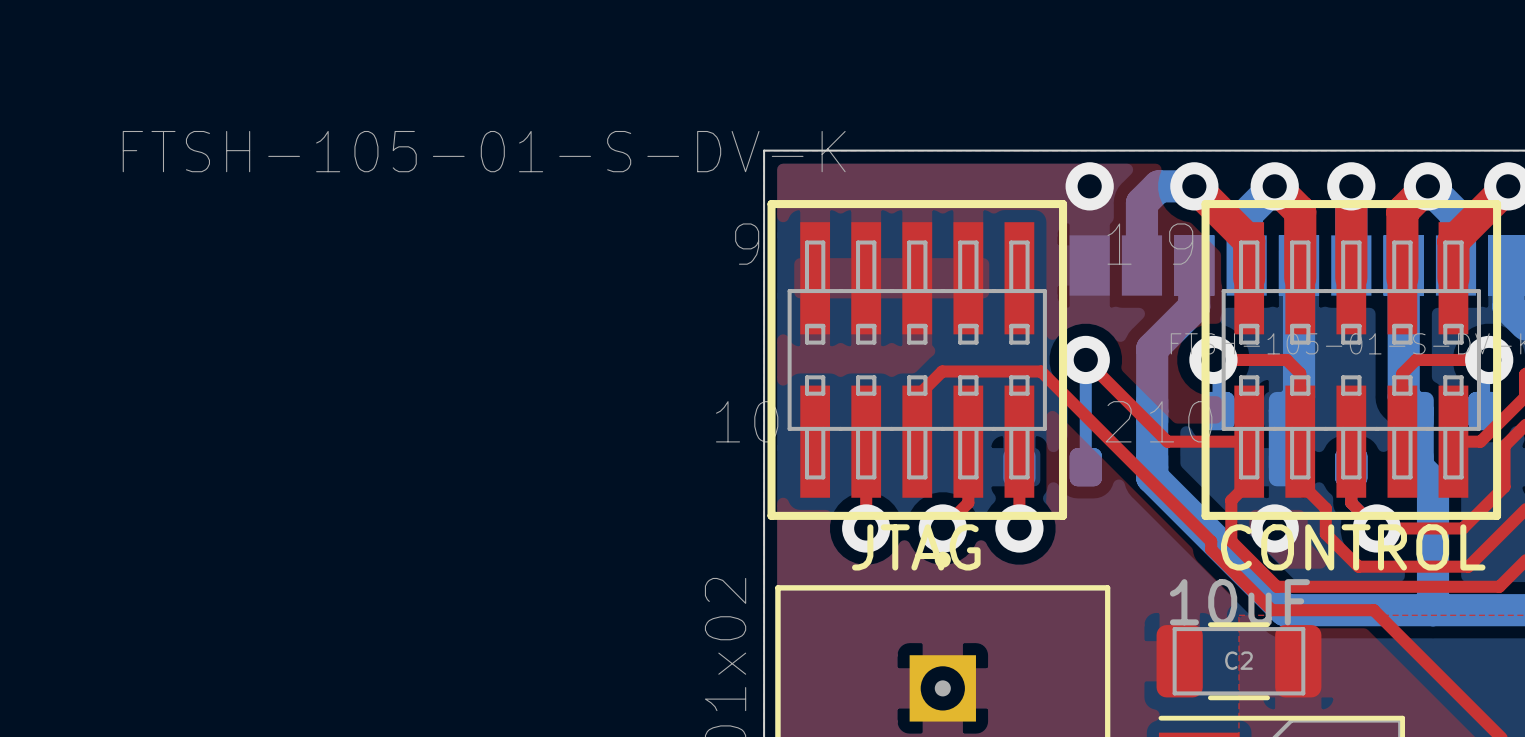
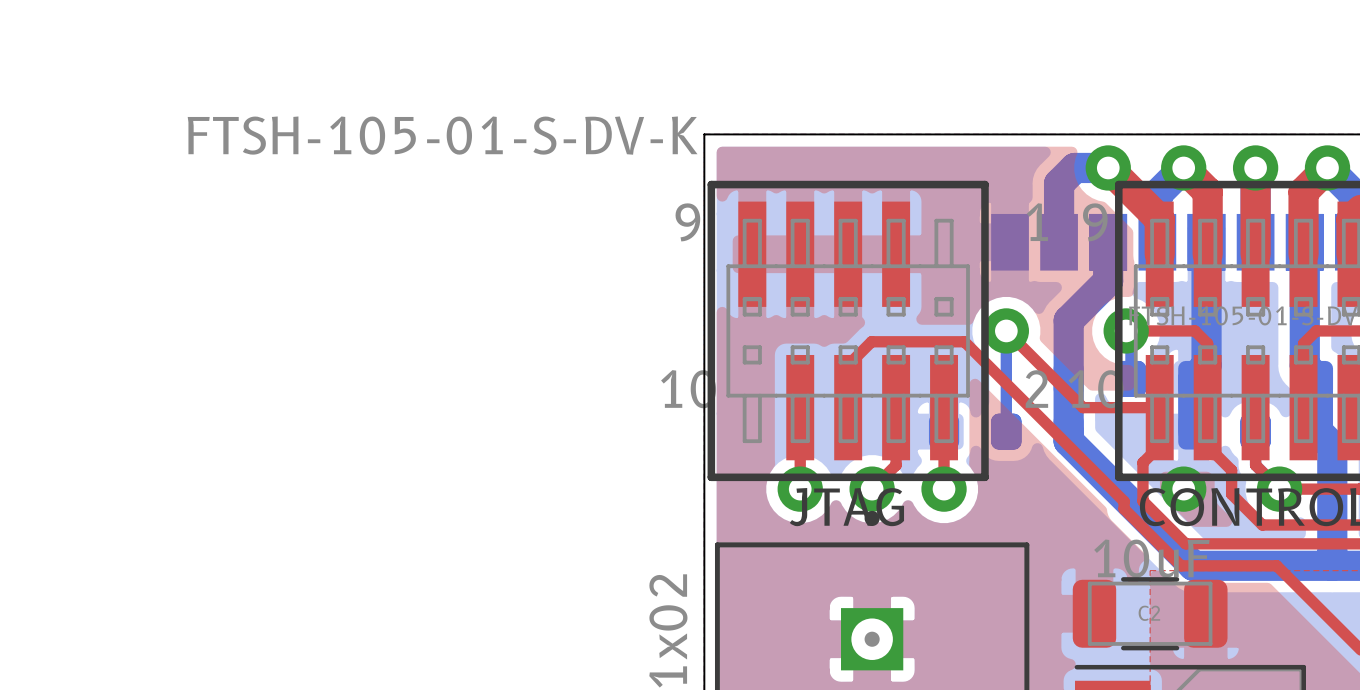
via: (1089, 186) -> none
part footprint: [767, 200, 1068, 520] -> [707, 180, 989, 482]

